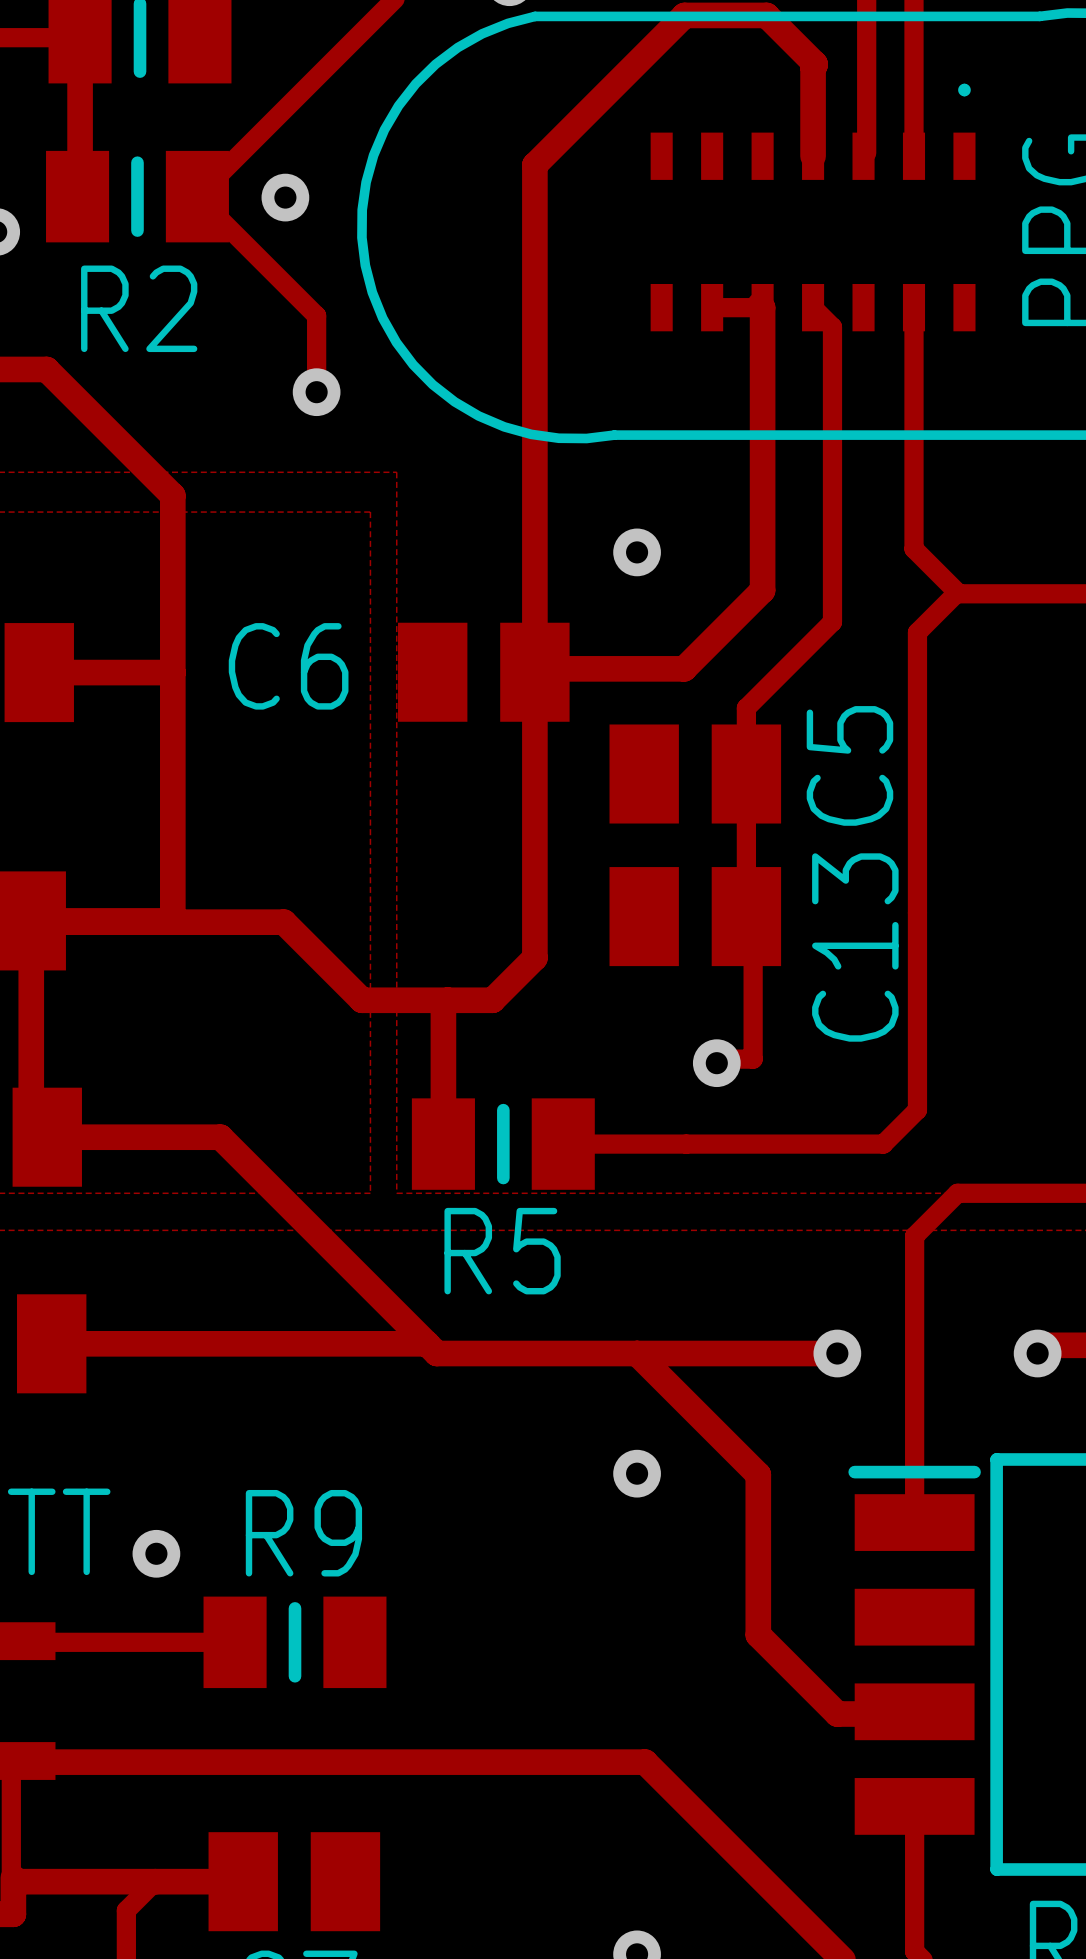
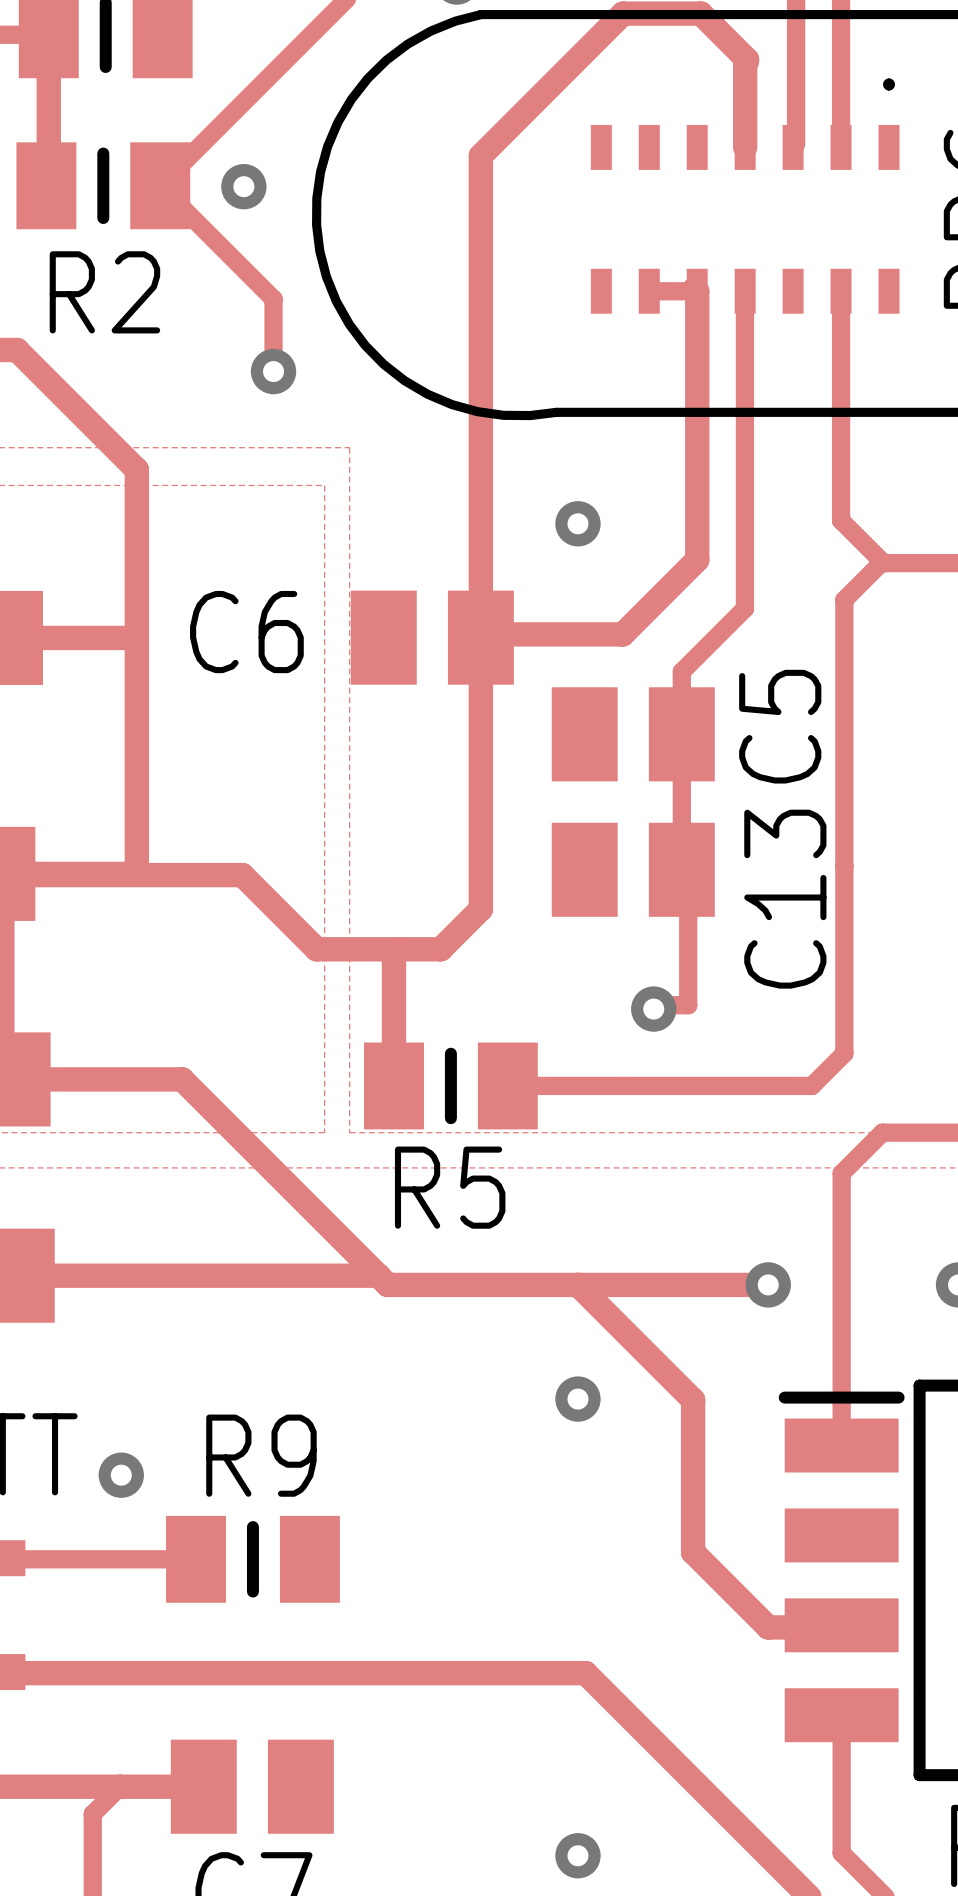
track: (813, 307) (832, 327) (832, 622) (812, 641) -> (744, 291) (744, 608)

